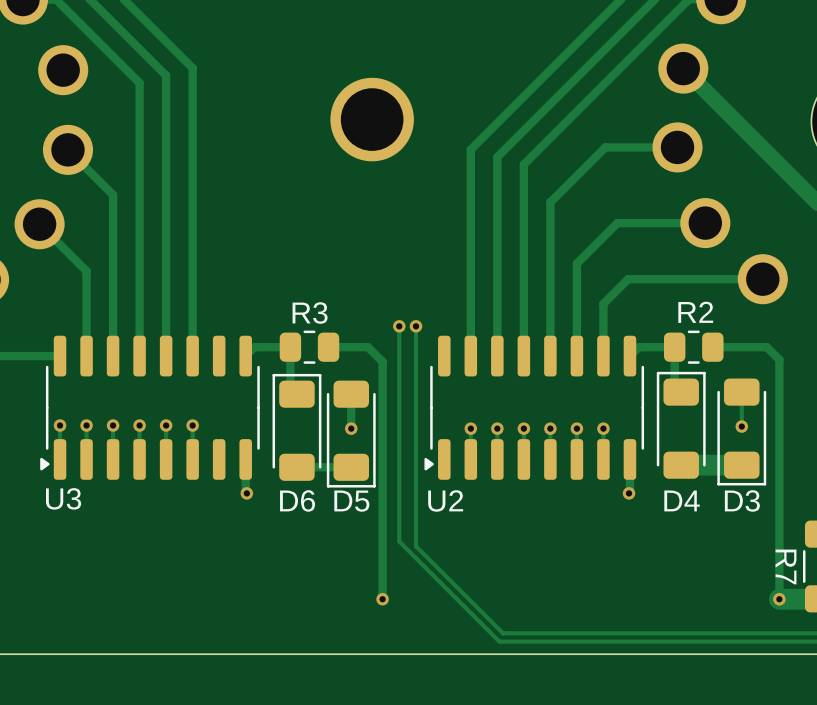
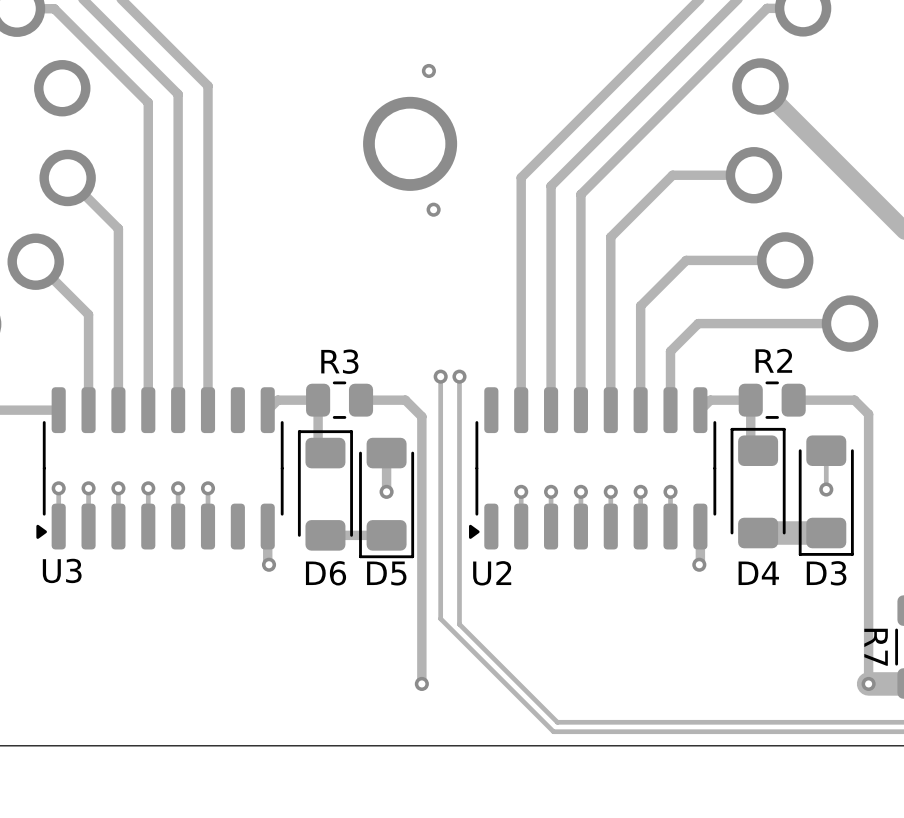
via: none -> (428, 70)
via: none -> (433, 209)

